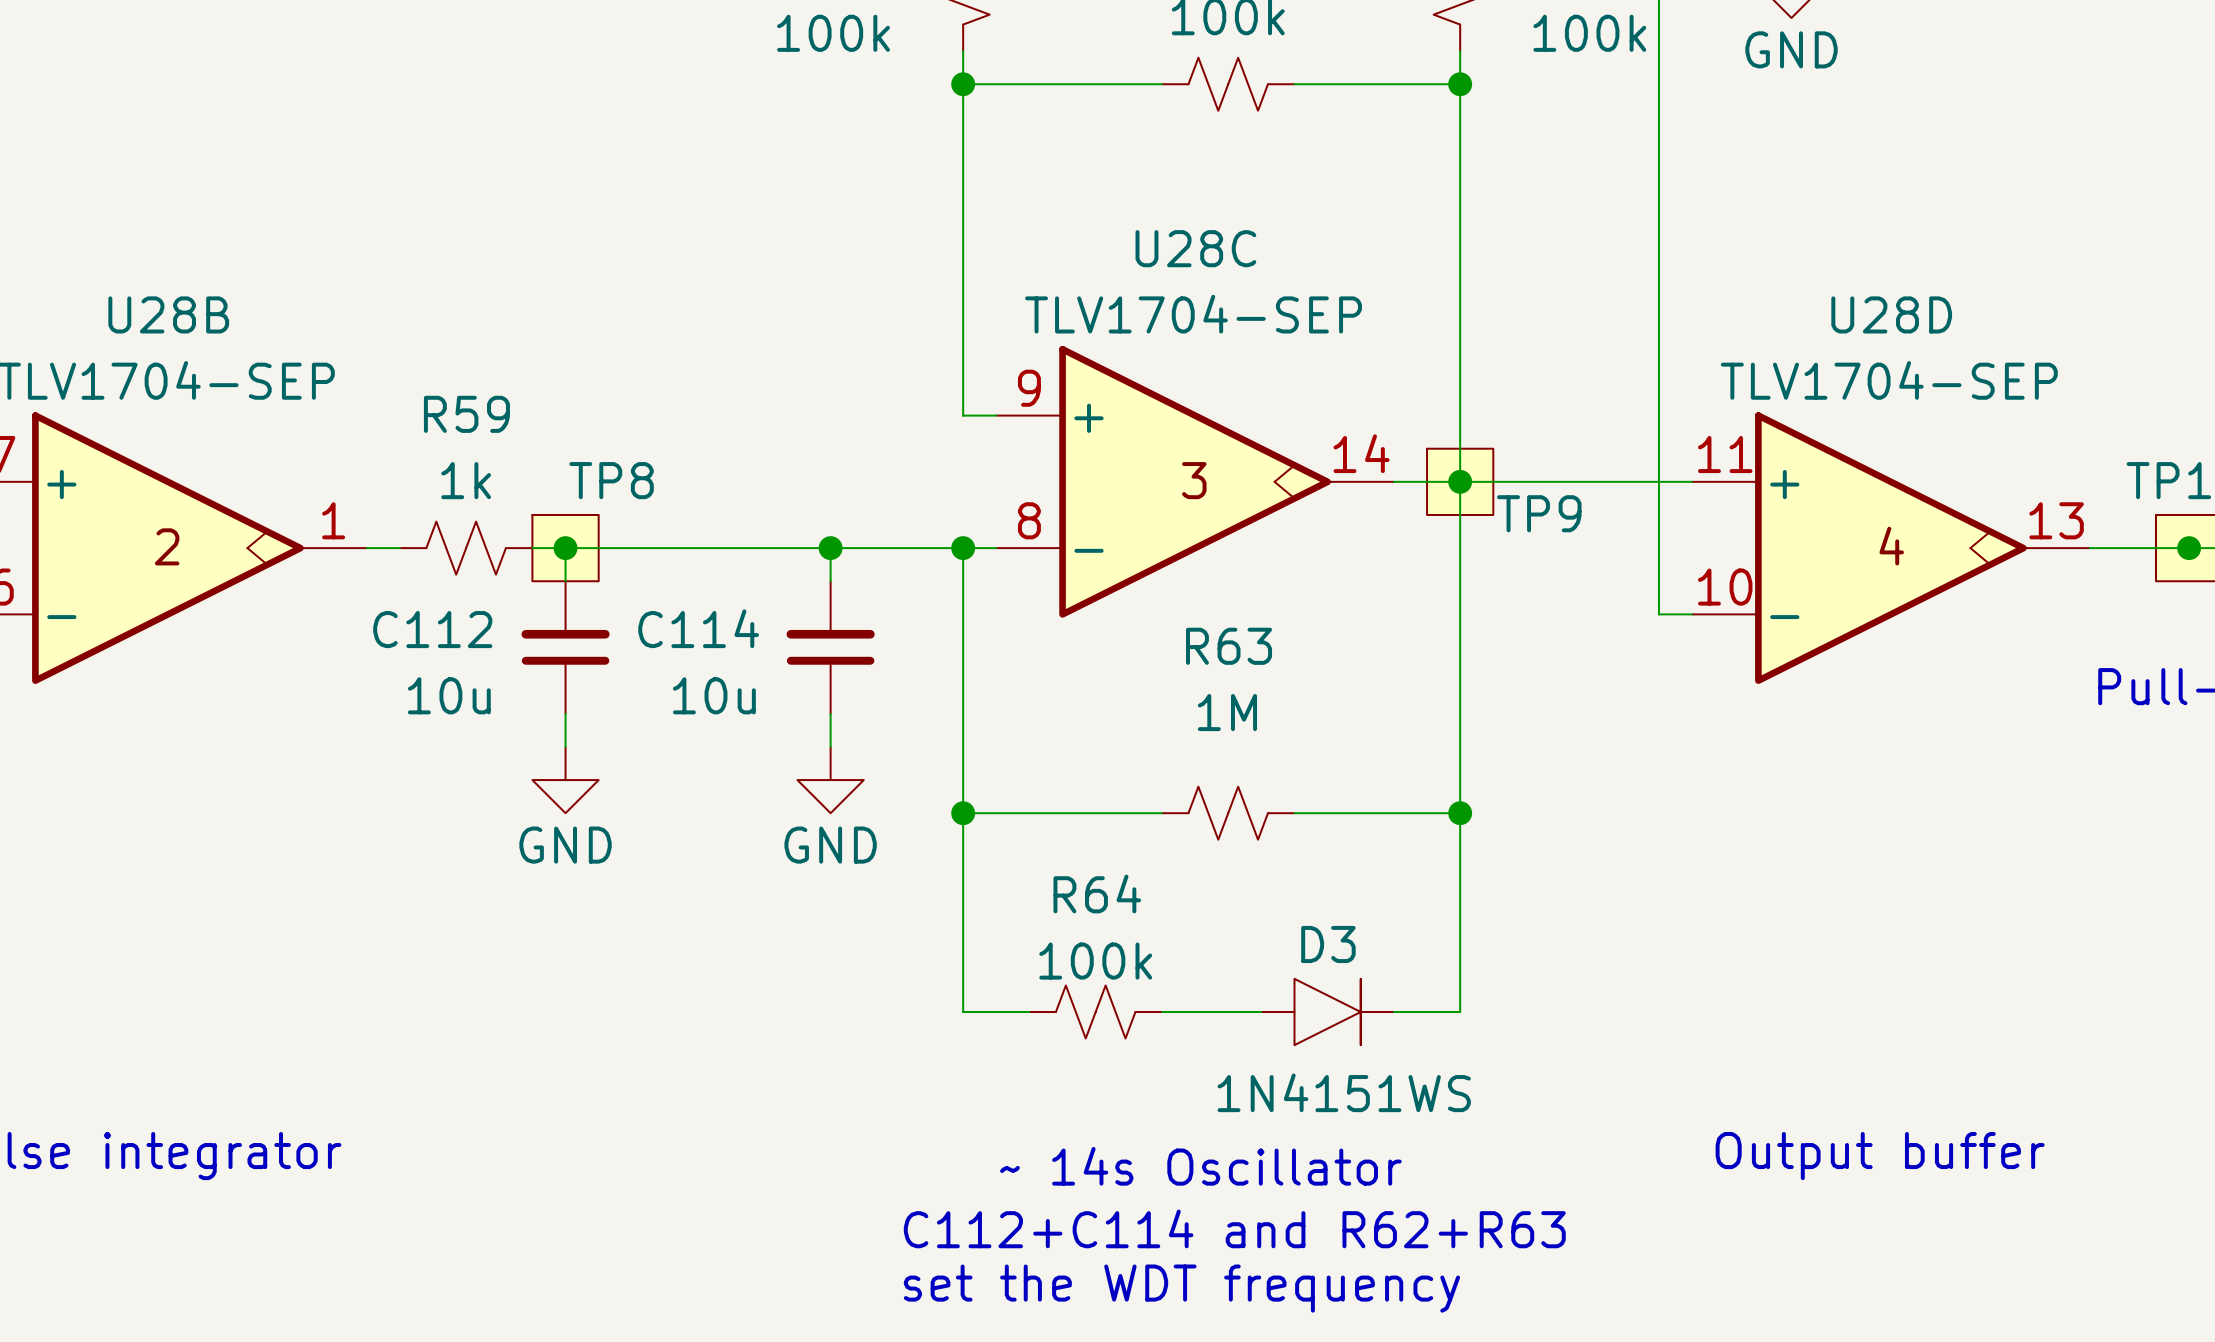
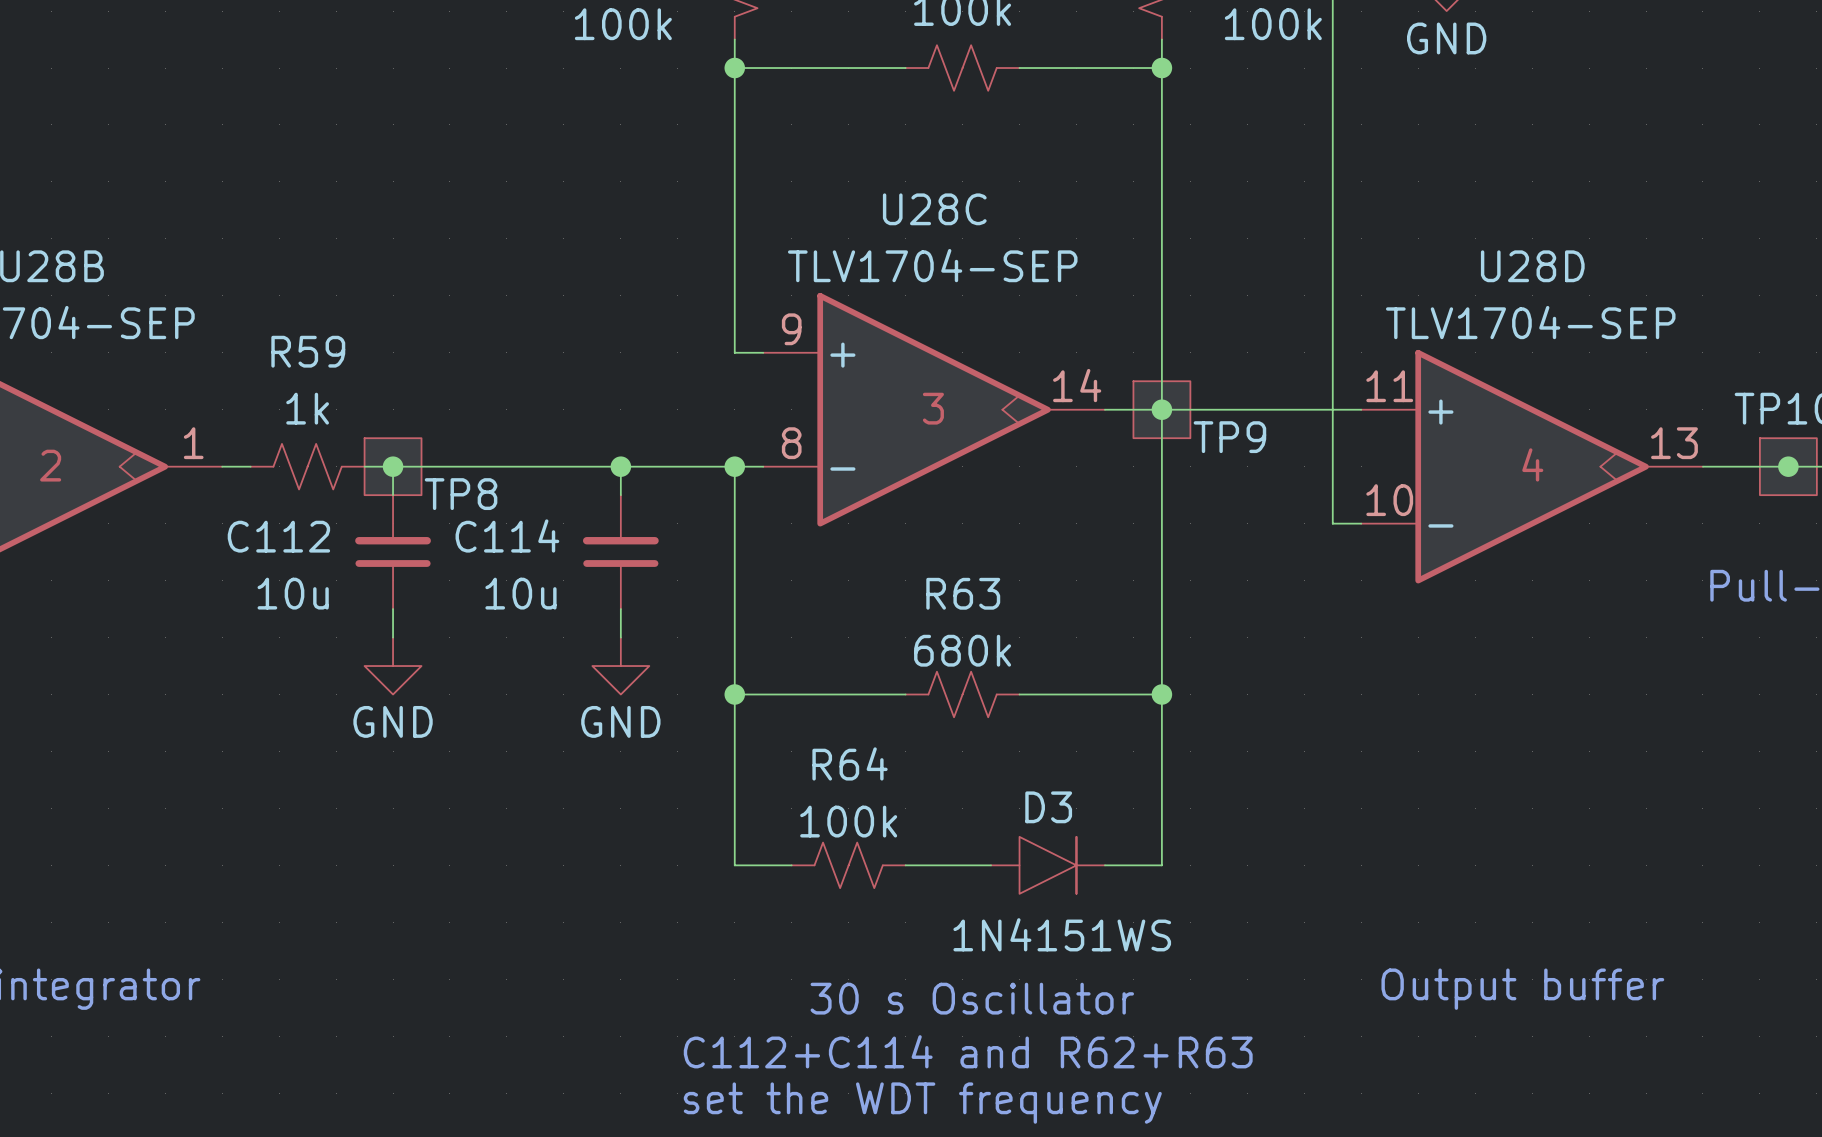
TP8 name position: TP8 (611, 480) -> TP8 (461, 494)
R63 name position: R63 (1229, 646) -> R63 (963, 593)
R63 value: 1M (1227, 712) -> 680k (962, 650)
text: ~ 14s Oscillator (1200, 1166) -> 30 s Oscillator (972, 998)

